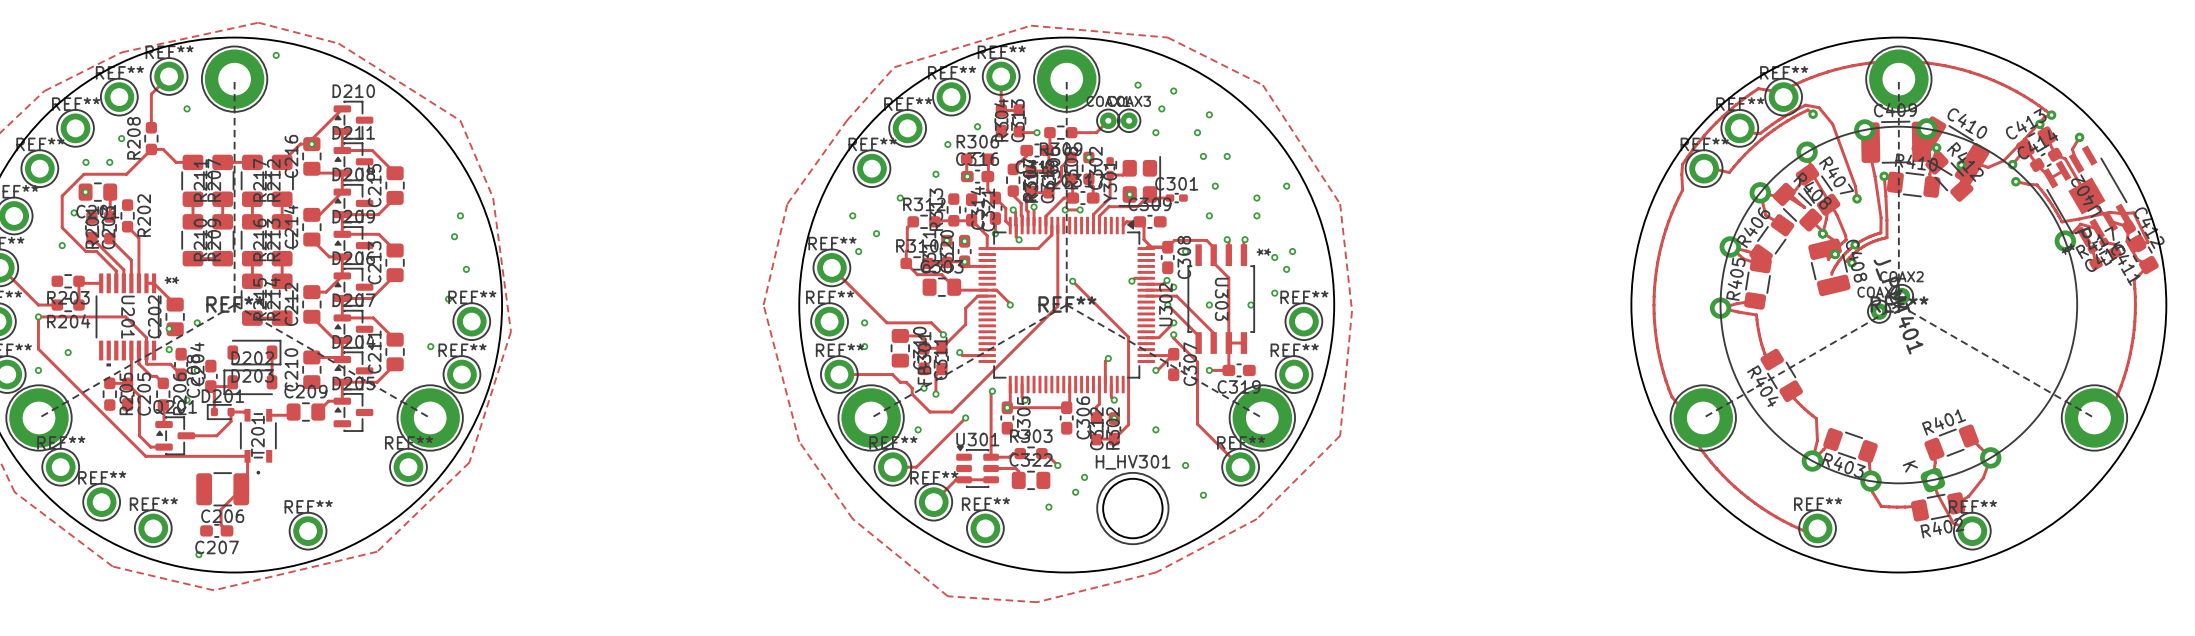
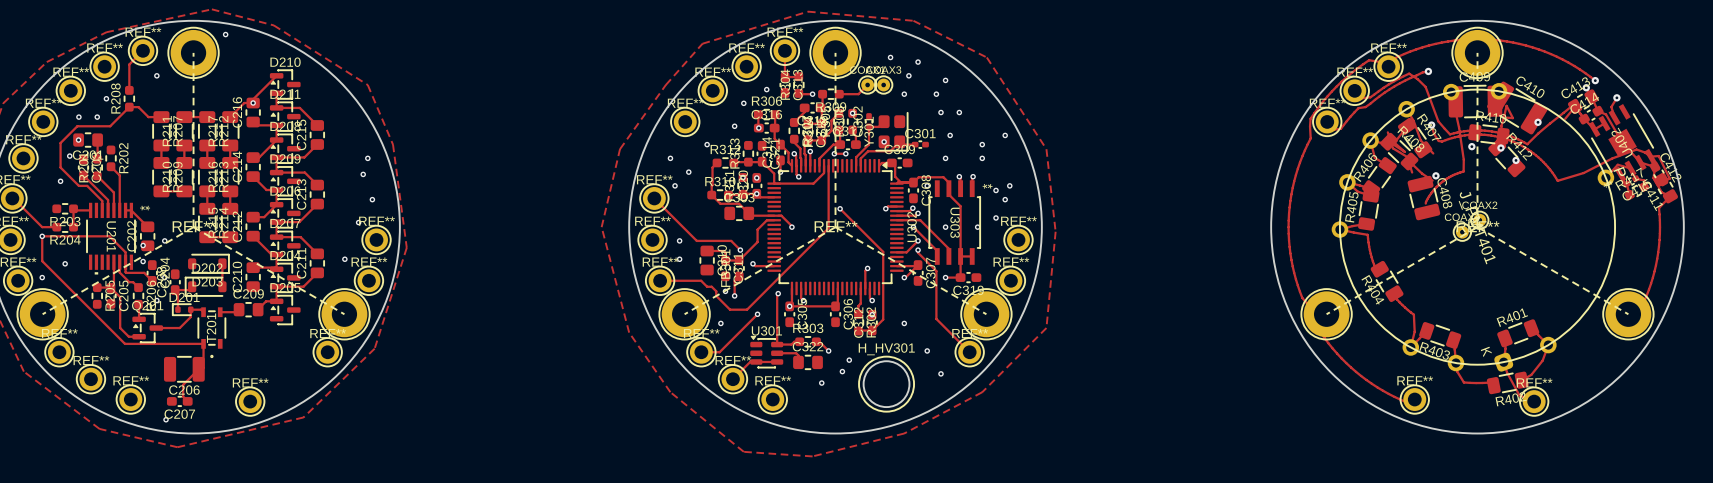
track: (1813, 114) (1807, 110) (1774, 129) (1750, 149) (1729, 172) (1704, 168) -> (1428, 71) (1399, 83) (1365, 107) (1358, 108) (1341, 128) (1334, 129) (1327, 121)
via position: (1813, 114) -> (1428, 71)
track: (2051, 115) (2044, 117) (2003, 160) (1988, 167) (1969, 162) (1961, 164) (1961, 190) -> none
track: (1739, 128) (1749, 132) (1760, 133) (1778, 120) (1805, 105) (1819, 107) (1832, 124) (1855, 186) (1857, 198) -> (1354, 90) (1361, 98) (1370, 97) (1409, 73) (1425, 86) (1438, 121) (1450, 134) (1467, 130) (1488, 131) (1508, 135) (1527, 144) (1572, 105) (1575, 106) (1584, 119)
via: (1936, 147) -> none
track: (1807, 152) (1813, 176) (1836, 214) (1845, 235) (1846, 239) (1835, 250) (1833, 252) (1831, 254) (1828, 259) (1825, 249) (1835, 254) -> (1406, 109) (1413, 121) (1420, 140) (1433, 153)
via position: (1961, 164) -> (1538, 122)
via: (2012, 164) -> none
via: none -> (1431, 125)
via: (1884, 176) -> none
R412 position: (1949, 176) -> (1506, 157)
track: (2015, 181) (2037, 184) (2061, 221) (2110, 212) (2123, 213) -> (1431, 125) (1438, 140) (1478, 134) (1497, 136) (1513, 141) (1538, 157) (1557, 180) (1583, 173) (1612, 158) (1636, 149) (1650, 156)
via: (2015, 181) -> none
track: none -> (1387, 132) (1392, 148) (1407, 157) (1412, 172)
track: (1895, 182) (1884, 176) (1886, 237) (1873, 241) (1858, 249) (1846, 261) (1852, 262) -> none
via: (1857, 198) -> none
via: none -> (1471, 146)
via: none -> (1500, 148)
track: (1828, 204) (1822, 233) -> none
via: none -> (1516, 160)
via: (1822, 233) -> none
via: none -> (1435, 175)
via: (1855, 244) -> none
via: (1835, 254) -> none
via: (1852, 262) -> none

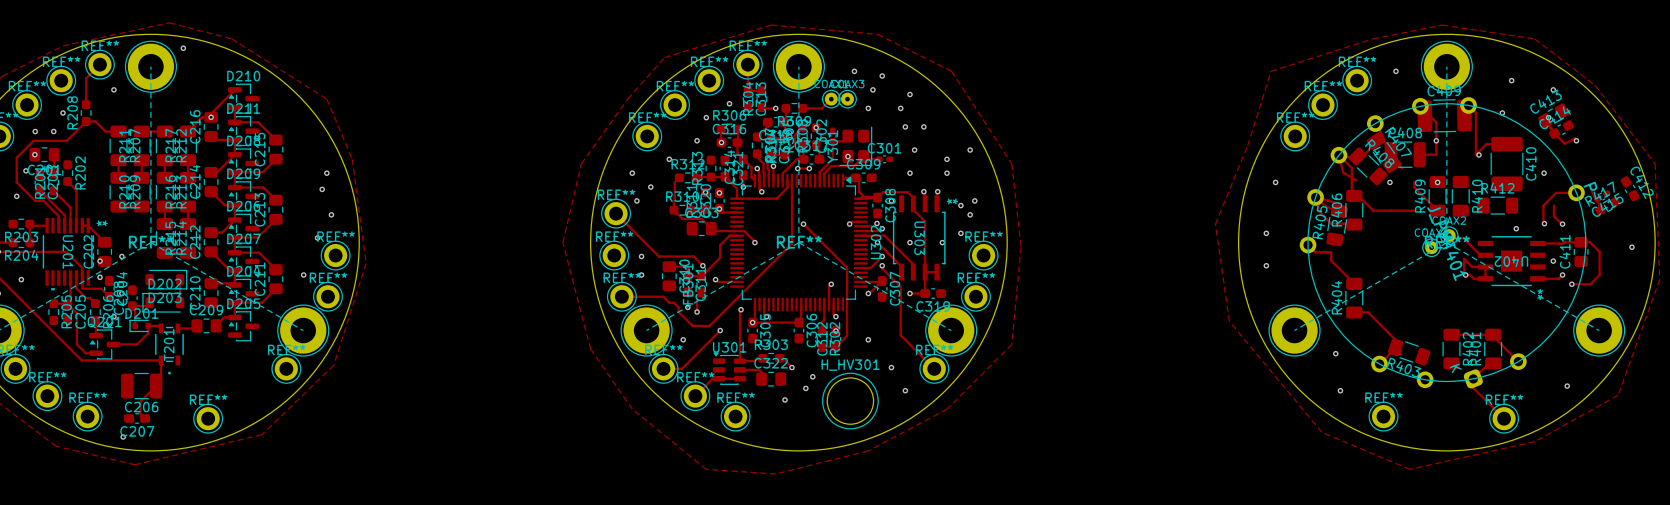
zone outline: none -> (1442, 25) (1372, 38) (1270, 71) (1247, 145) (1215, 224) (1229, 321) (1321, 432) (1409, 469) (1534, 441) (1618, 395) (1659, 279) (1655, 163) (1594, 85) (1534, 38) (1442, 25)
via: none -> (1395, 71)
via: none -> (1511, 80)
track: (1428, 71) (1399, 83) (1365, 107) (1358, 108) (1341, 128) (1334, 129) (1327, 121) -> none
via: (1428, 71) -> none
via: none -> (1553, 89)
track: (1595, 80) (1562, 59) (1526, 45) (1493, 39) (1454, 40) (1410, 51) (1393, 58) (1388, 66) (1380, 62) (1369, 60) (1336, 86) (1310, 118) (1310, 138) (1295, 175) (1289, 213) (1290, 253) (1299, 291) (1310, 308) (1326, 314) (1317, 319) (1320, 332) (1346, 363) (1366, 379) (1388, 393) (1406, 402) (1414, 399) -> none
via: (1595, 80) -> none
track: (1586, 87) (1597, 111) (1606, 114) (1622, 143) (1640, 162) (1655, 167) (1653, 178) (1661, 192) (1670, 196) (1659, 208) (1658, 252) (1648, 289) (1638, 312) (1628, 314) -> none
via: (1586, 87) -> none
track: (1354, 90) (1361, 98) (1370, 97) (1409, 73) (1425, 86) (1438, 121) (1450, 134) (1467, 130) (1488, 131) (1508, 135) (1527, 144) (1572, 105) (1580, 106) (1575, 106) (1565, 118) -> none
track: none -> (1468, 105) (1475, 112) (1475, 154) (1486, 144) (1507, 144)
track: none -> (1420, 106) (1436, 122) (1436, 154) (1419, 154)
track: (1616, 97) (1611, 107) (1614, 117) -> none
via: (1616, 97) -> none
via: none -> (1502, 113)
track: (1455, 101) (1457, 98) (1451, 92) (1459, 127) (1463, 171) (1440, 183) (1431, 193) (1425, 203) -> none
via: none -> (1548, 117)
C410 rotation: 0° (1517, 108) -> 58.5° clockwise (1507, 163)
C410 position: (1517, 108) -> (1507, 163)
track: (1506, 117) (1512, 118) (1506, 105) (1501, 126) (1503, 136) -> none
via: (1538, 122) -> none
track: (1431, 125) (1438, 140) (1478, 134) (1497, 136) (1513, 141) (1538, 157) (1557, 180) (1583, 173) (1612, 158) (1636, 149) (1650, 156) (1658, 156) (1669, 178) (1660, 179) -> none
via: (1431, 125) -> none
via: none -> (1436, 140)
via: none -> (1576, 140)
track: (1387, 132) (1392, 148) (1407, 157) (1412, 172) -> none
R410 rotation: 0° (1488, 134) -> 83° clockwise (1460, 196)
R410 position: (1488, 134) -> (1460, 196)
track: none -> (1338, 155) (1351, 168) (1351, 193) (1358, 195) (1373, 210) (1414, 210)
via: none -> (1478, 154)
track: (1389, 141) (1404, 151) (1394, 142) -> none
U402 rotation: 0° (1622, 143) -> 59.9° counterclockwise (1511, 261)
U402 position: (1622, 143) -> (1511, 261)
via: (1471, 146) -> none
via: (1500, 148) -> none
R412 rotation: 0° (1506, 157) -> 47.5° counterclockwise (1497, 205)
R412 position: (1506, 157) -> (1497, 205)
via: none -> (1544, 173)
via: (1516, 160) -> none
track: (1409, 161) (1432, 180) -> none
via: none -> (1275, 182)
via: none -> (1389, 182)
track: none -> (1414, 181) (1414, 187) (1437, 210)
via: none -> (1437, 182)
via: (1435, 175) -> none
R406 rotation: 0° (1379, 177) -> 35.5° counterclockwise (1354, 210)
track: (1605, 177) (1617, 164) (1630, 168) (1635, 178) (1644, 180) (1644, 186) -> (1576, 192) (1556, 192) (1543, 205) (1544, 224)
R409: none -> (1437, 196)
track: none -> (1315, 197) (1318, 200) (1318, 211) (1331, 223) (1354, 224)
C411 rotation: 0° (1665, 188) -> 30° clockwise (1581, 251)
C411 position: (1665, 188) -> (1581, 251)
track: none -> (1553, 205) (1553, 216) (1561, 224)
C408 rotation: 0° (1423, 198) -> 76.5° counterclockwise (1405, 154)
C408 position: (1423, 198) -> (1405, 154)
via: none -> (1544, 223)
via: none -> (1562, 224)
via: none -> (1516, 228)
via: none -> (1266, 233)
track: none -> (1449, 235) (1451, 237) (1463, 237) (1480, 255) (1485, 255)
track: (1366, 223) (1339, 229) (1367, 234) (1374, 264) (1375, 268) (1379, 269) -> none
track: none -> (1537, 243) (1589, 242) (1599, 251) (1599, 275) (1590, 284) (1571, 284)
track: none -> (1308, 245) (1315, 252) (1331, 252) (1331, 260) (1354, 283)
via: none -> (1631, 247)
track: none -> (1464, 258) (1465, 275) (1470, 275) (1473, 278) (1485, 278) (1485, 267) (1472, 267) (1464, 258)
via: none -> (1553, 261)
via: none -> (1266, 265)
via: none -> (1465, 275)
track: none -> (1562, 275) (1558, 278) (1537, 278)
via: none -> (1562, 275)
via: none -> (1571, 284)
R404 rotation: 0° (1387, 281) -> 31° clockwise (1354, 298)
track: (1394, 293) (1397, 299) (1413, 314) (1414, 331) (1410, 347) (1426, 330) -> none
track: none -> (1354, 312) (1368, 312) (1400, 344) (1400, 353) (1389, 353) (1379, 364)
track: none -> (1451, 334) (1493, 334) (1518, 361)
track: (1531, 328) (1548, 345) (1542, 360) (1531, 374) (1521, 380) -> none
R401 rotation: 0° (1518, 333) -> 69° counterclockwise (1493, 349)
via: none -> (1335, 353)
track: (1504, 338) (1503, 362) (1507, 372) (1519, 395) (1534, 401) -> (1493, 363) (1488, 363) (1473, 378) (1473, 387) (1504, 418)
track: (1453, 340) (1457, 371) (1463, 382) (1488, 382) (1493, 385) -> none
via: none -> (1567, 386)
via: none -> (1340, 390)
R402 rotation: 0° (1507, 382) -> 79° counterclockwise (1451, 349)
R402 position: (1507, 382) -> (1451, 349)

